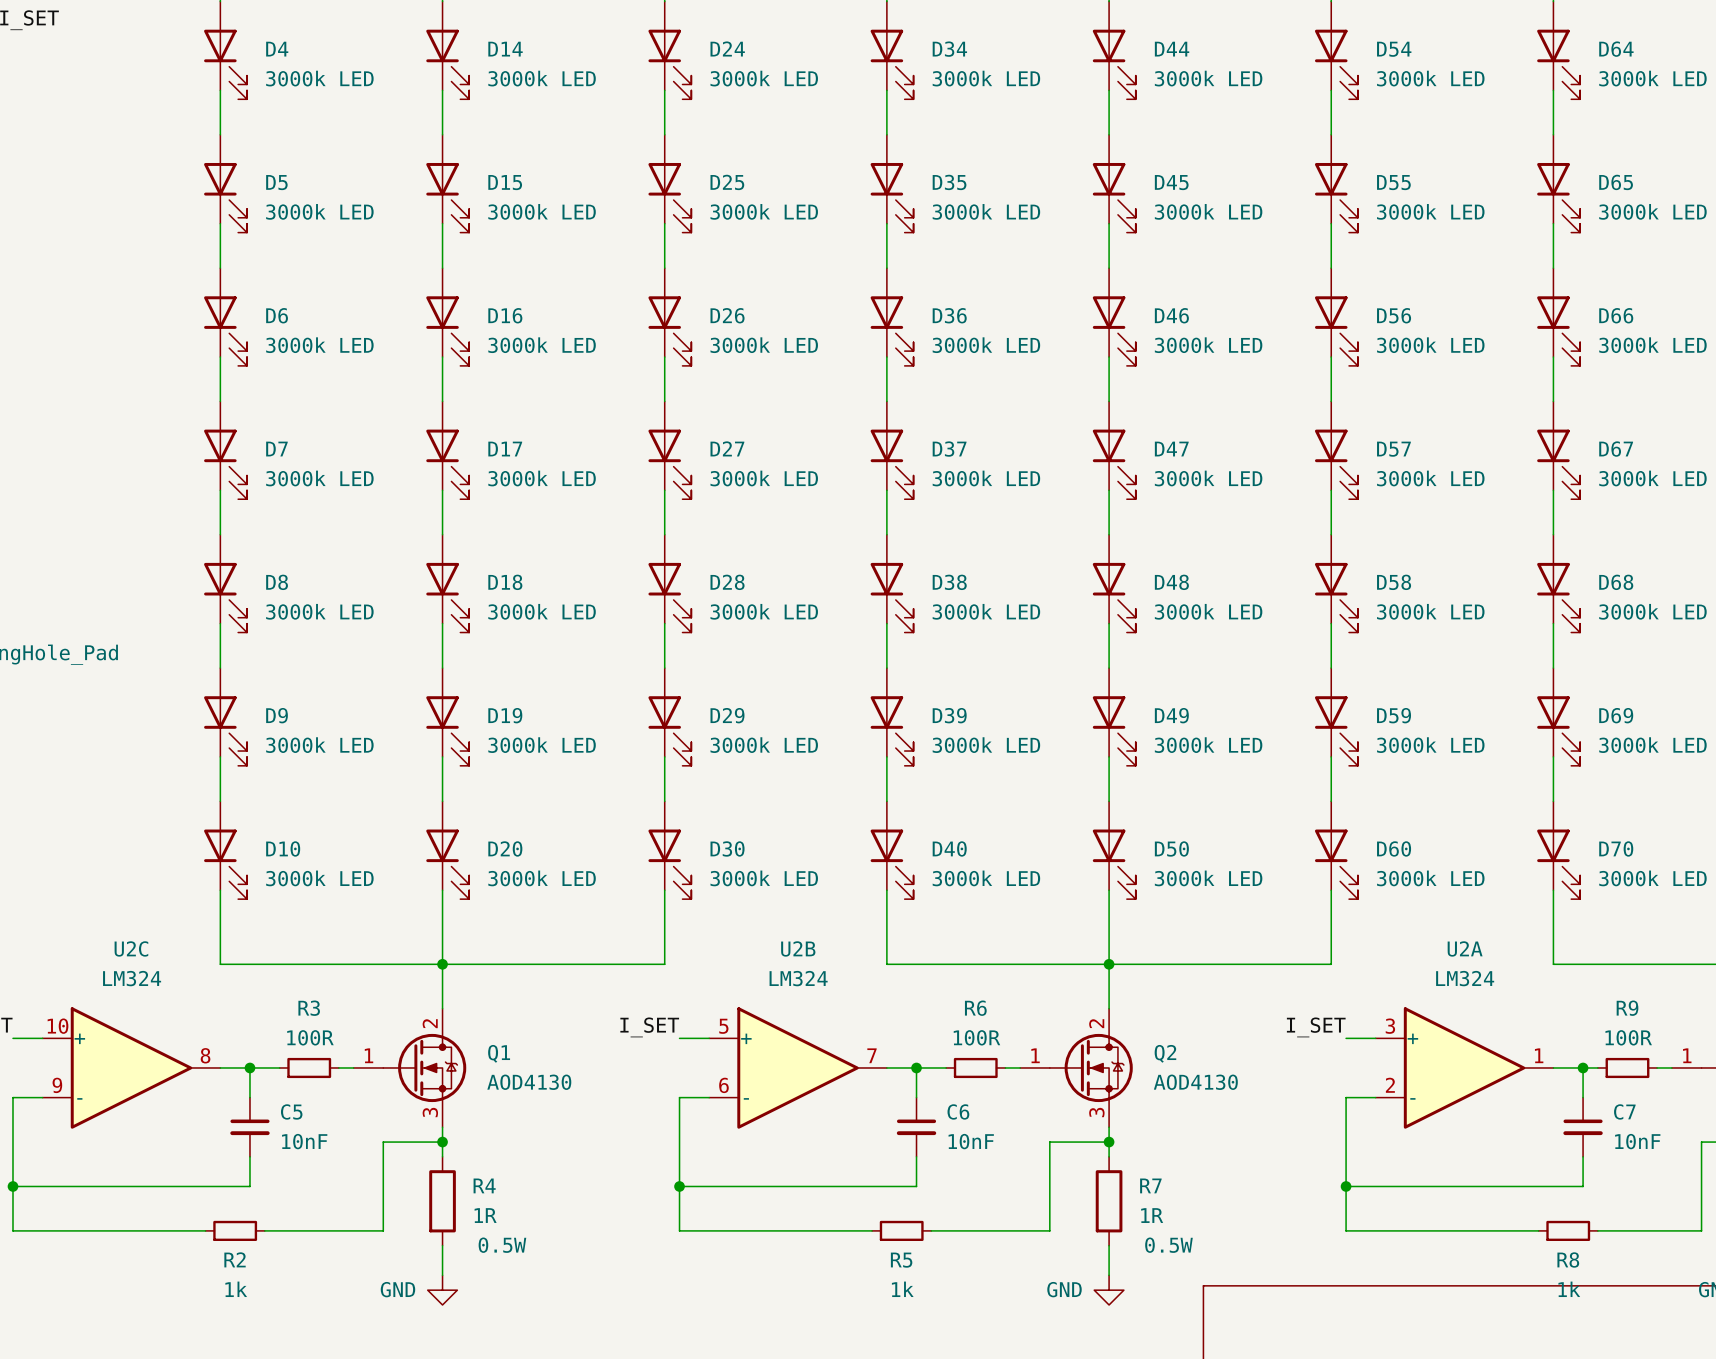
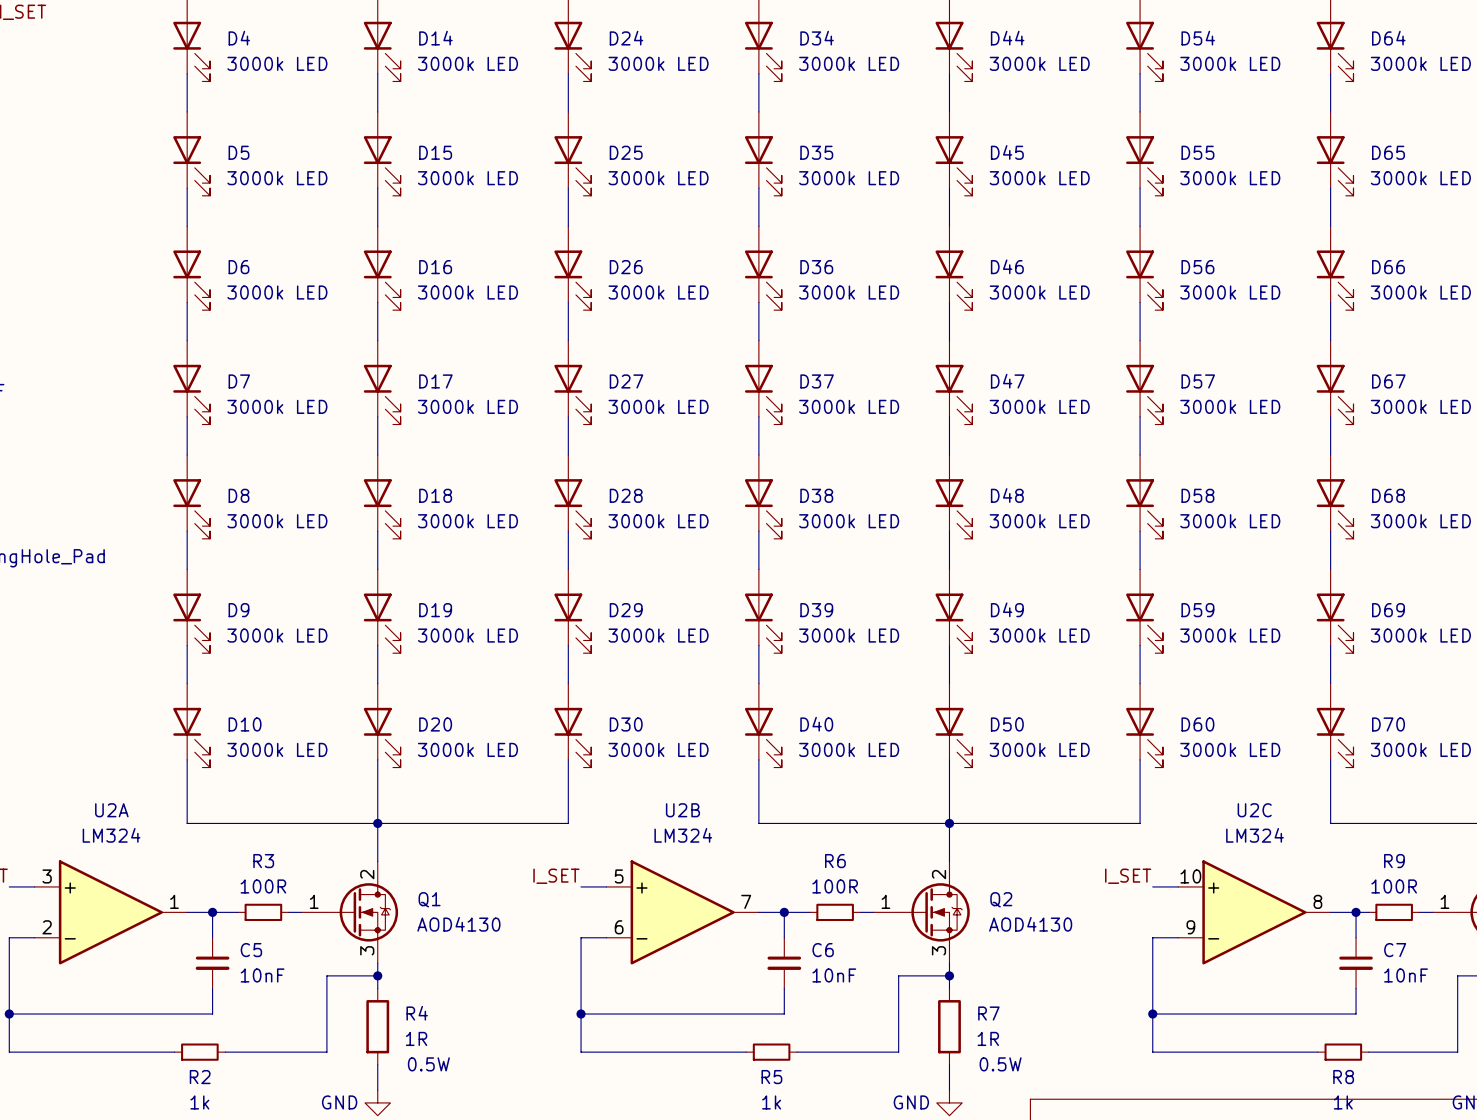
U2C position: (131, 1067) -> (1254, 912)
U2A position: (1464, 1067) -> (110, 912)

